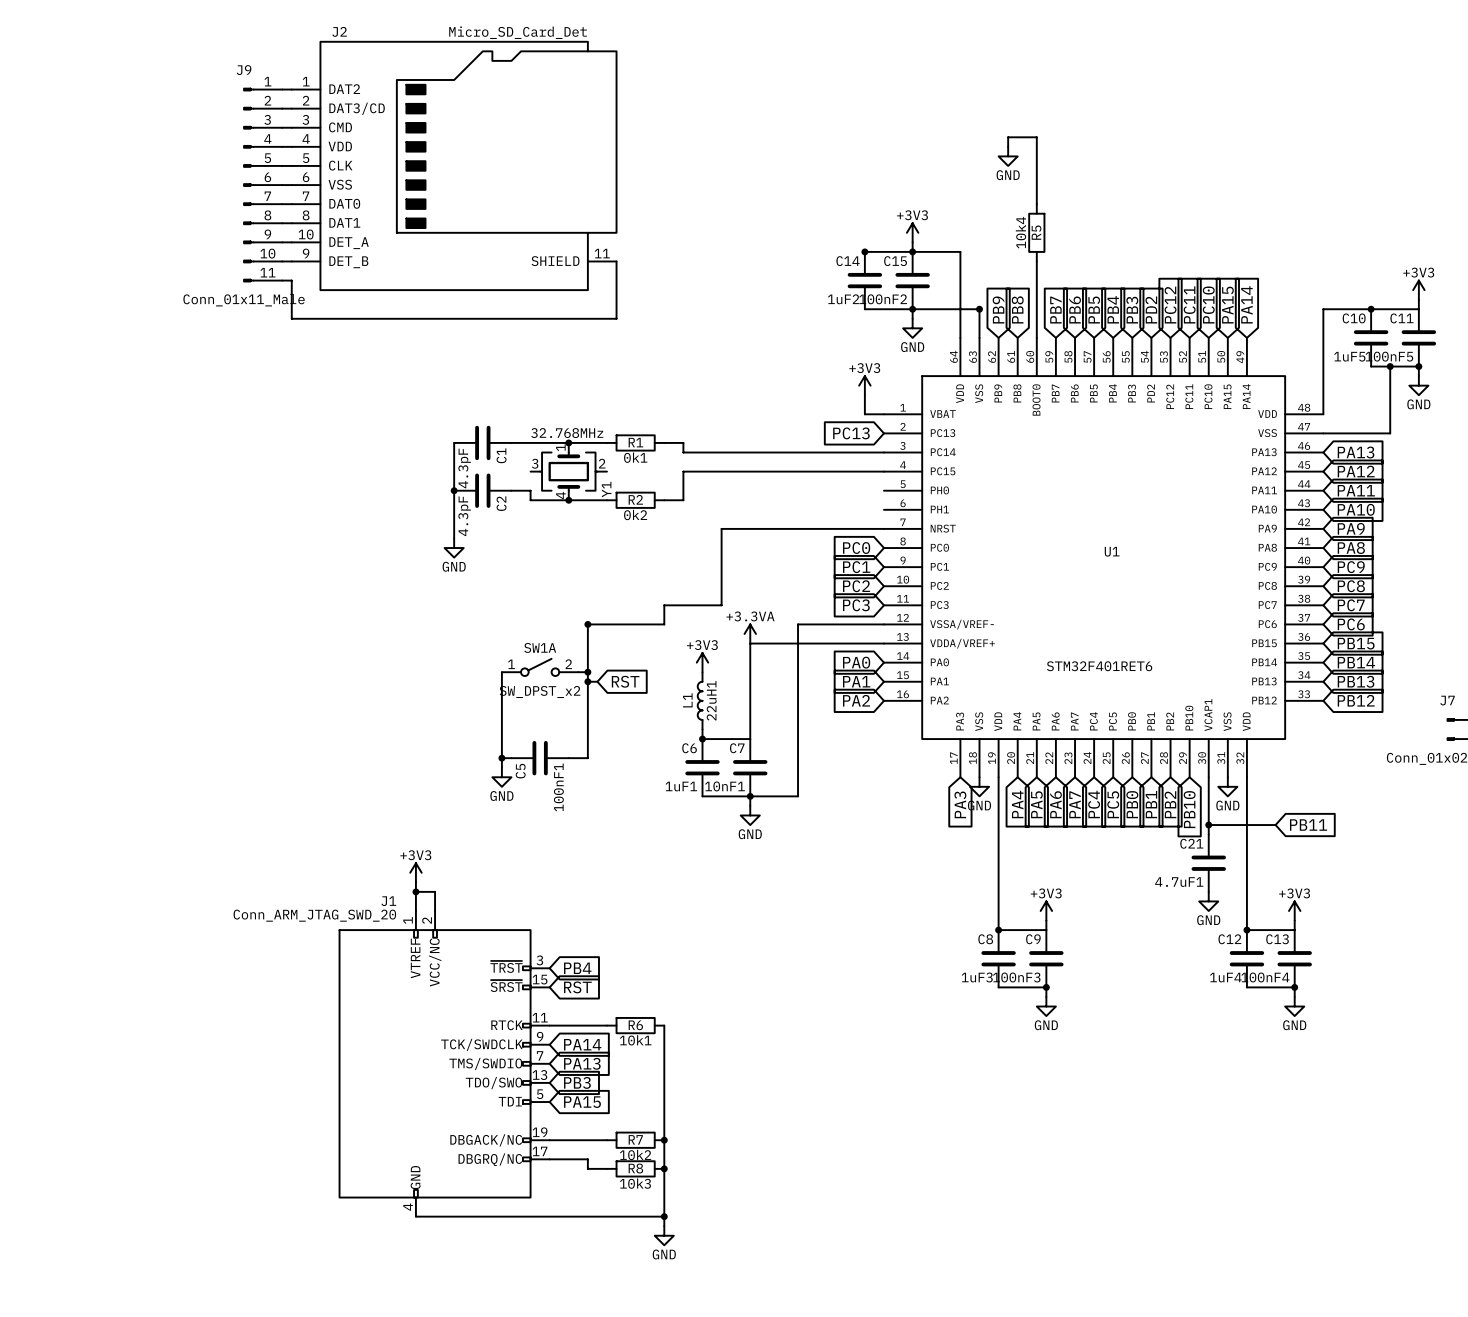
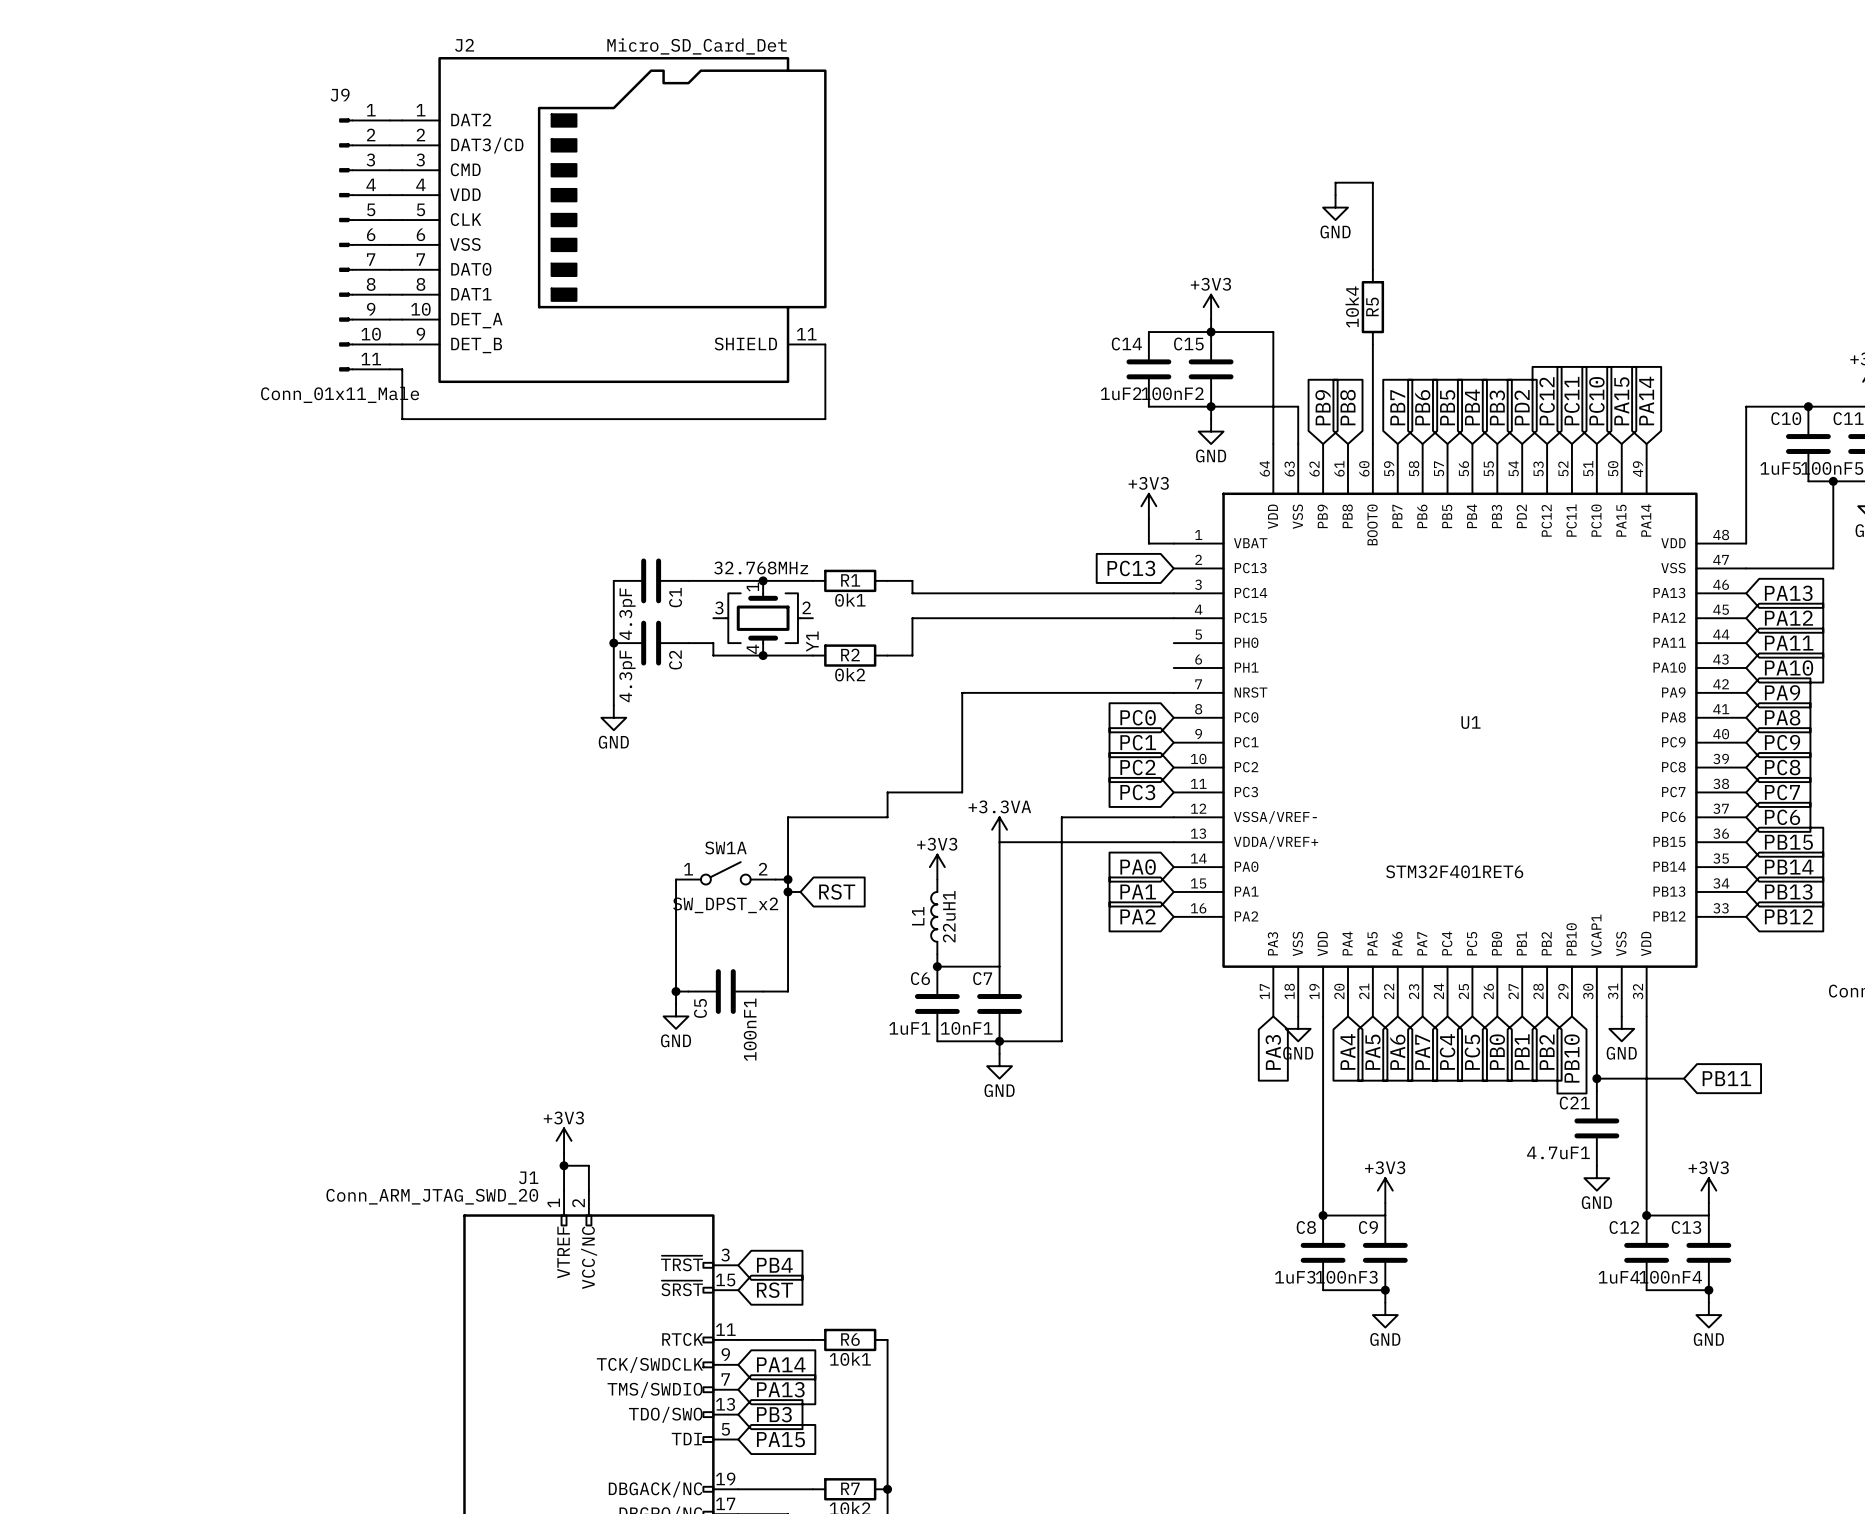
junction: (864, 251) -> none
junction: (979, 309) -> none
junction: (587, 624) -> none

